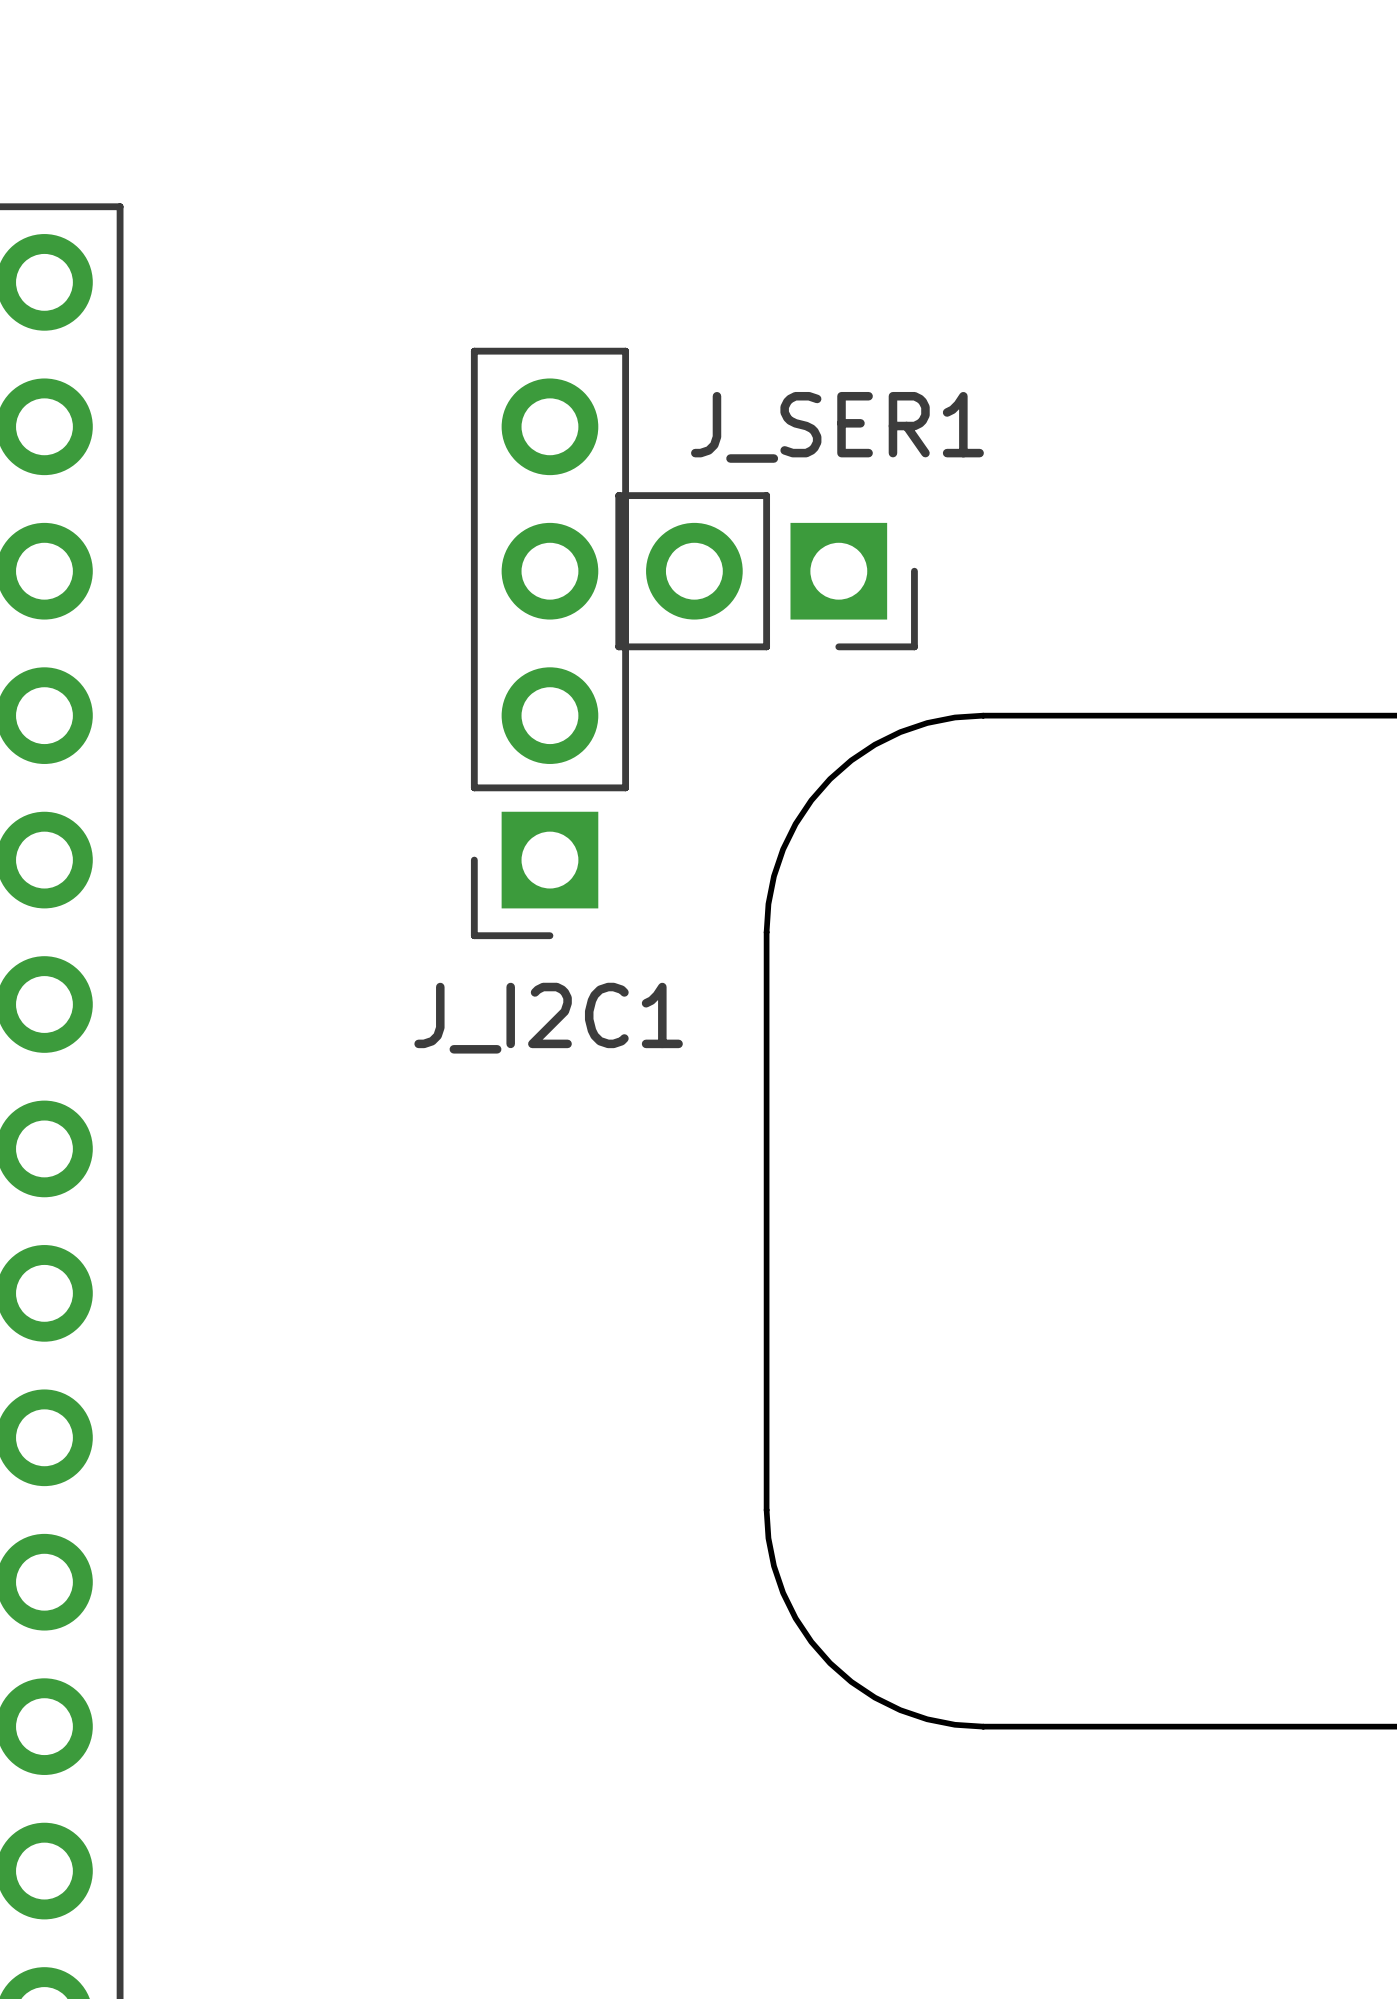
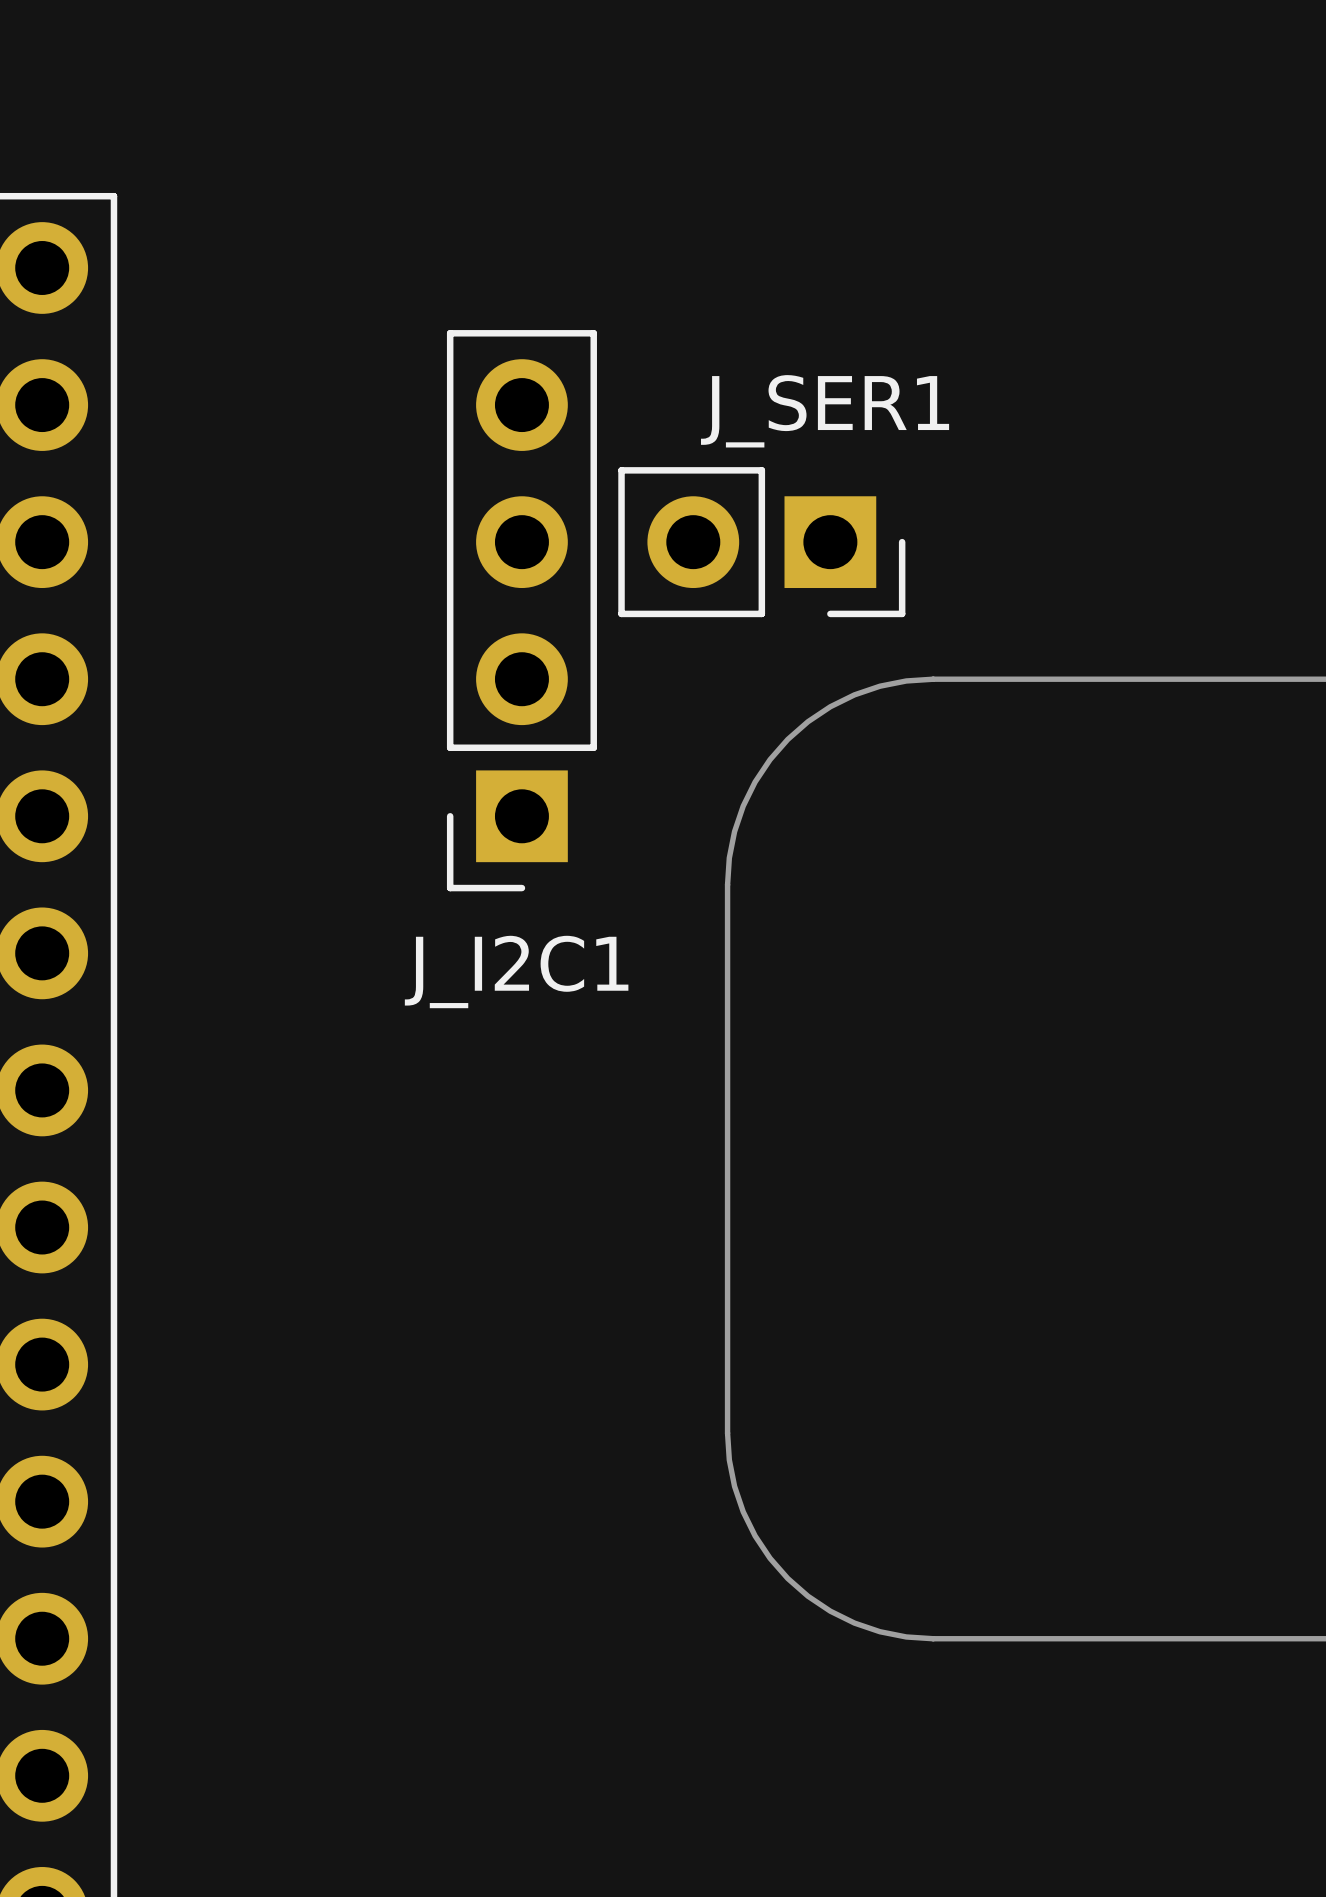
J_SER1 position: (766, 571) -> (761, 542)

